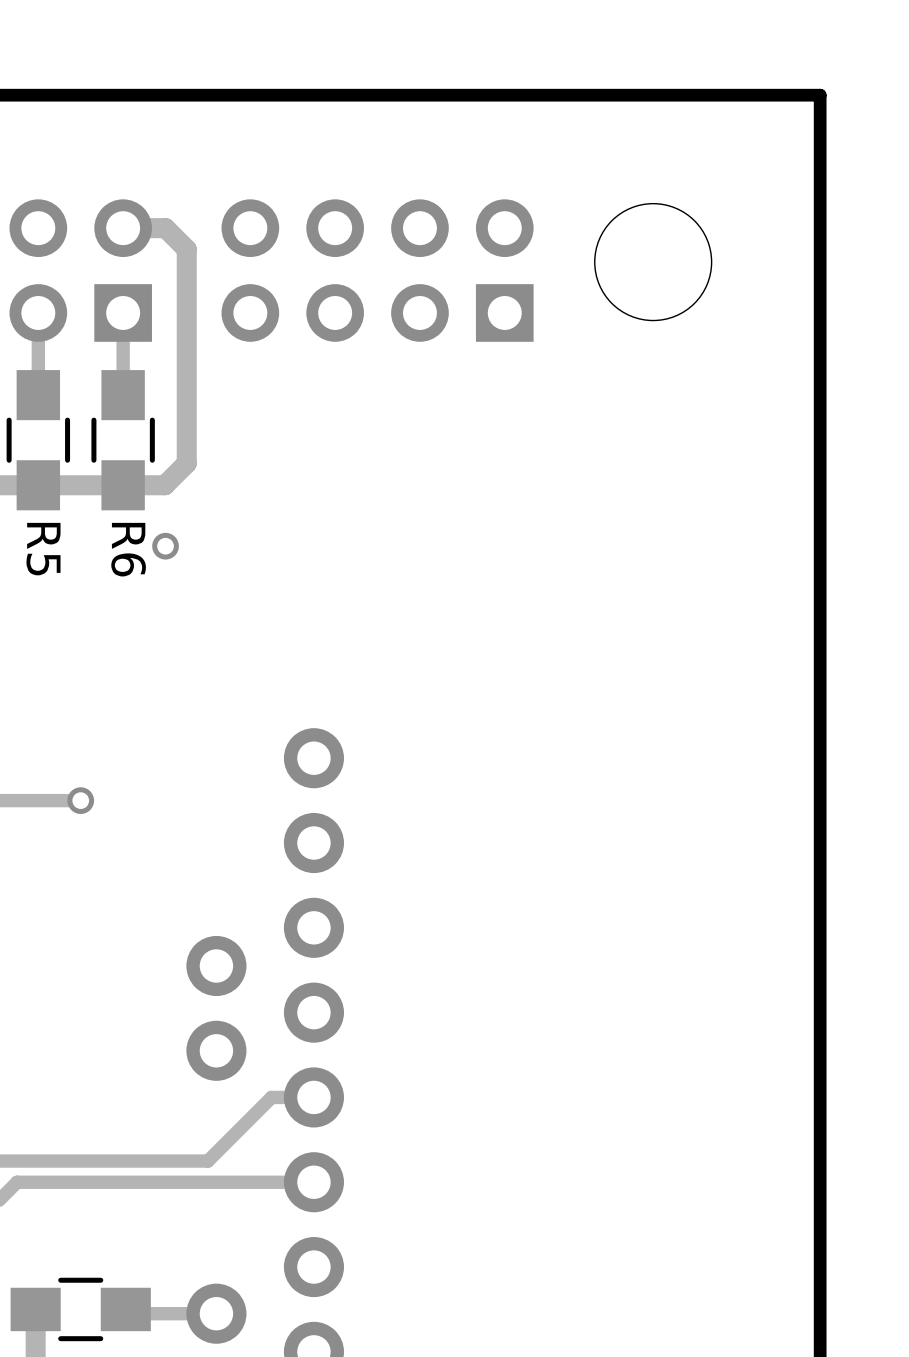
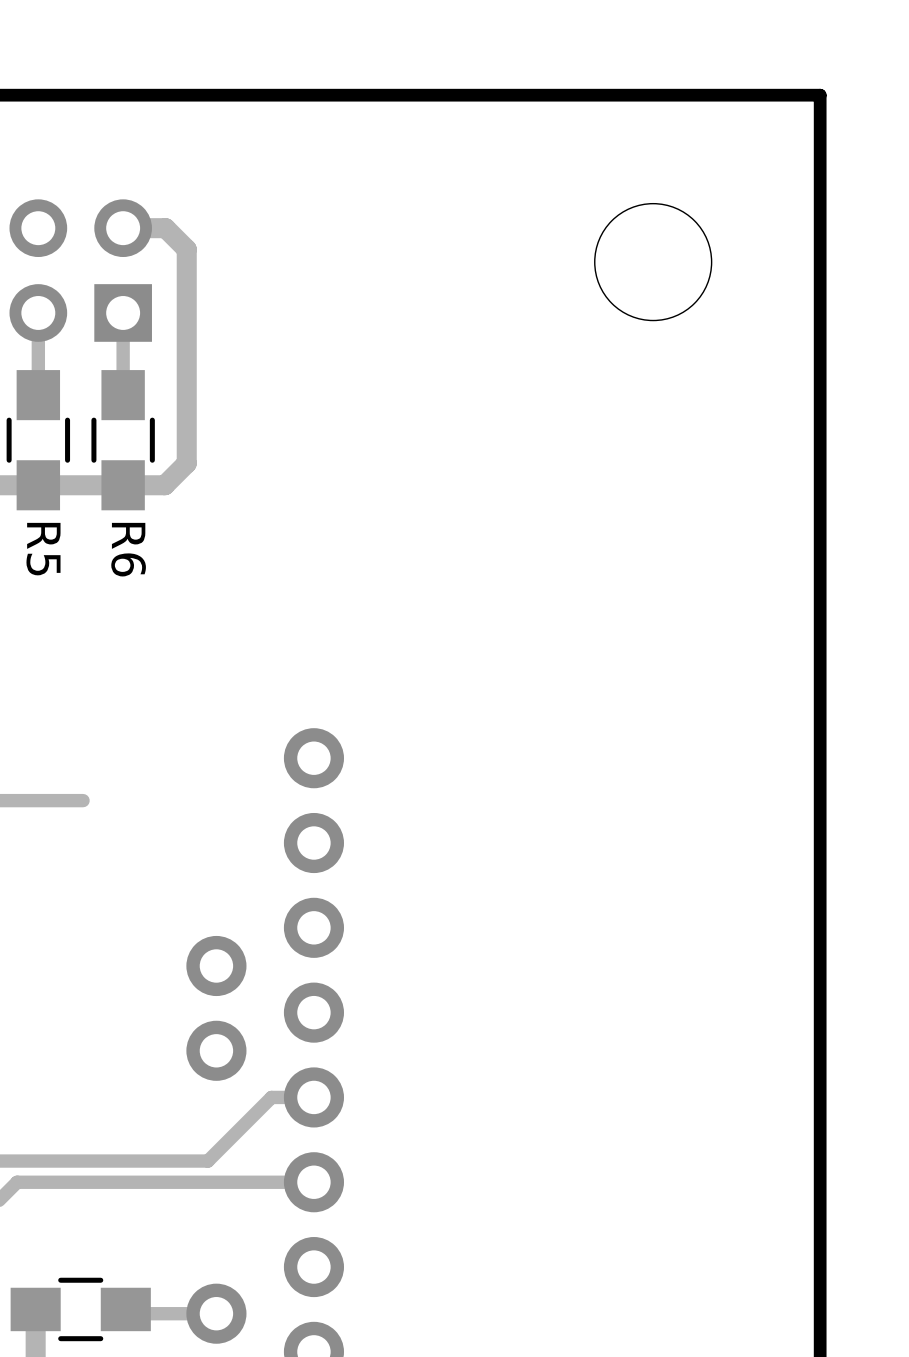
part: (377, 270) -> none
part: (165, 546) -> none
via: (80, 800) -> none

